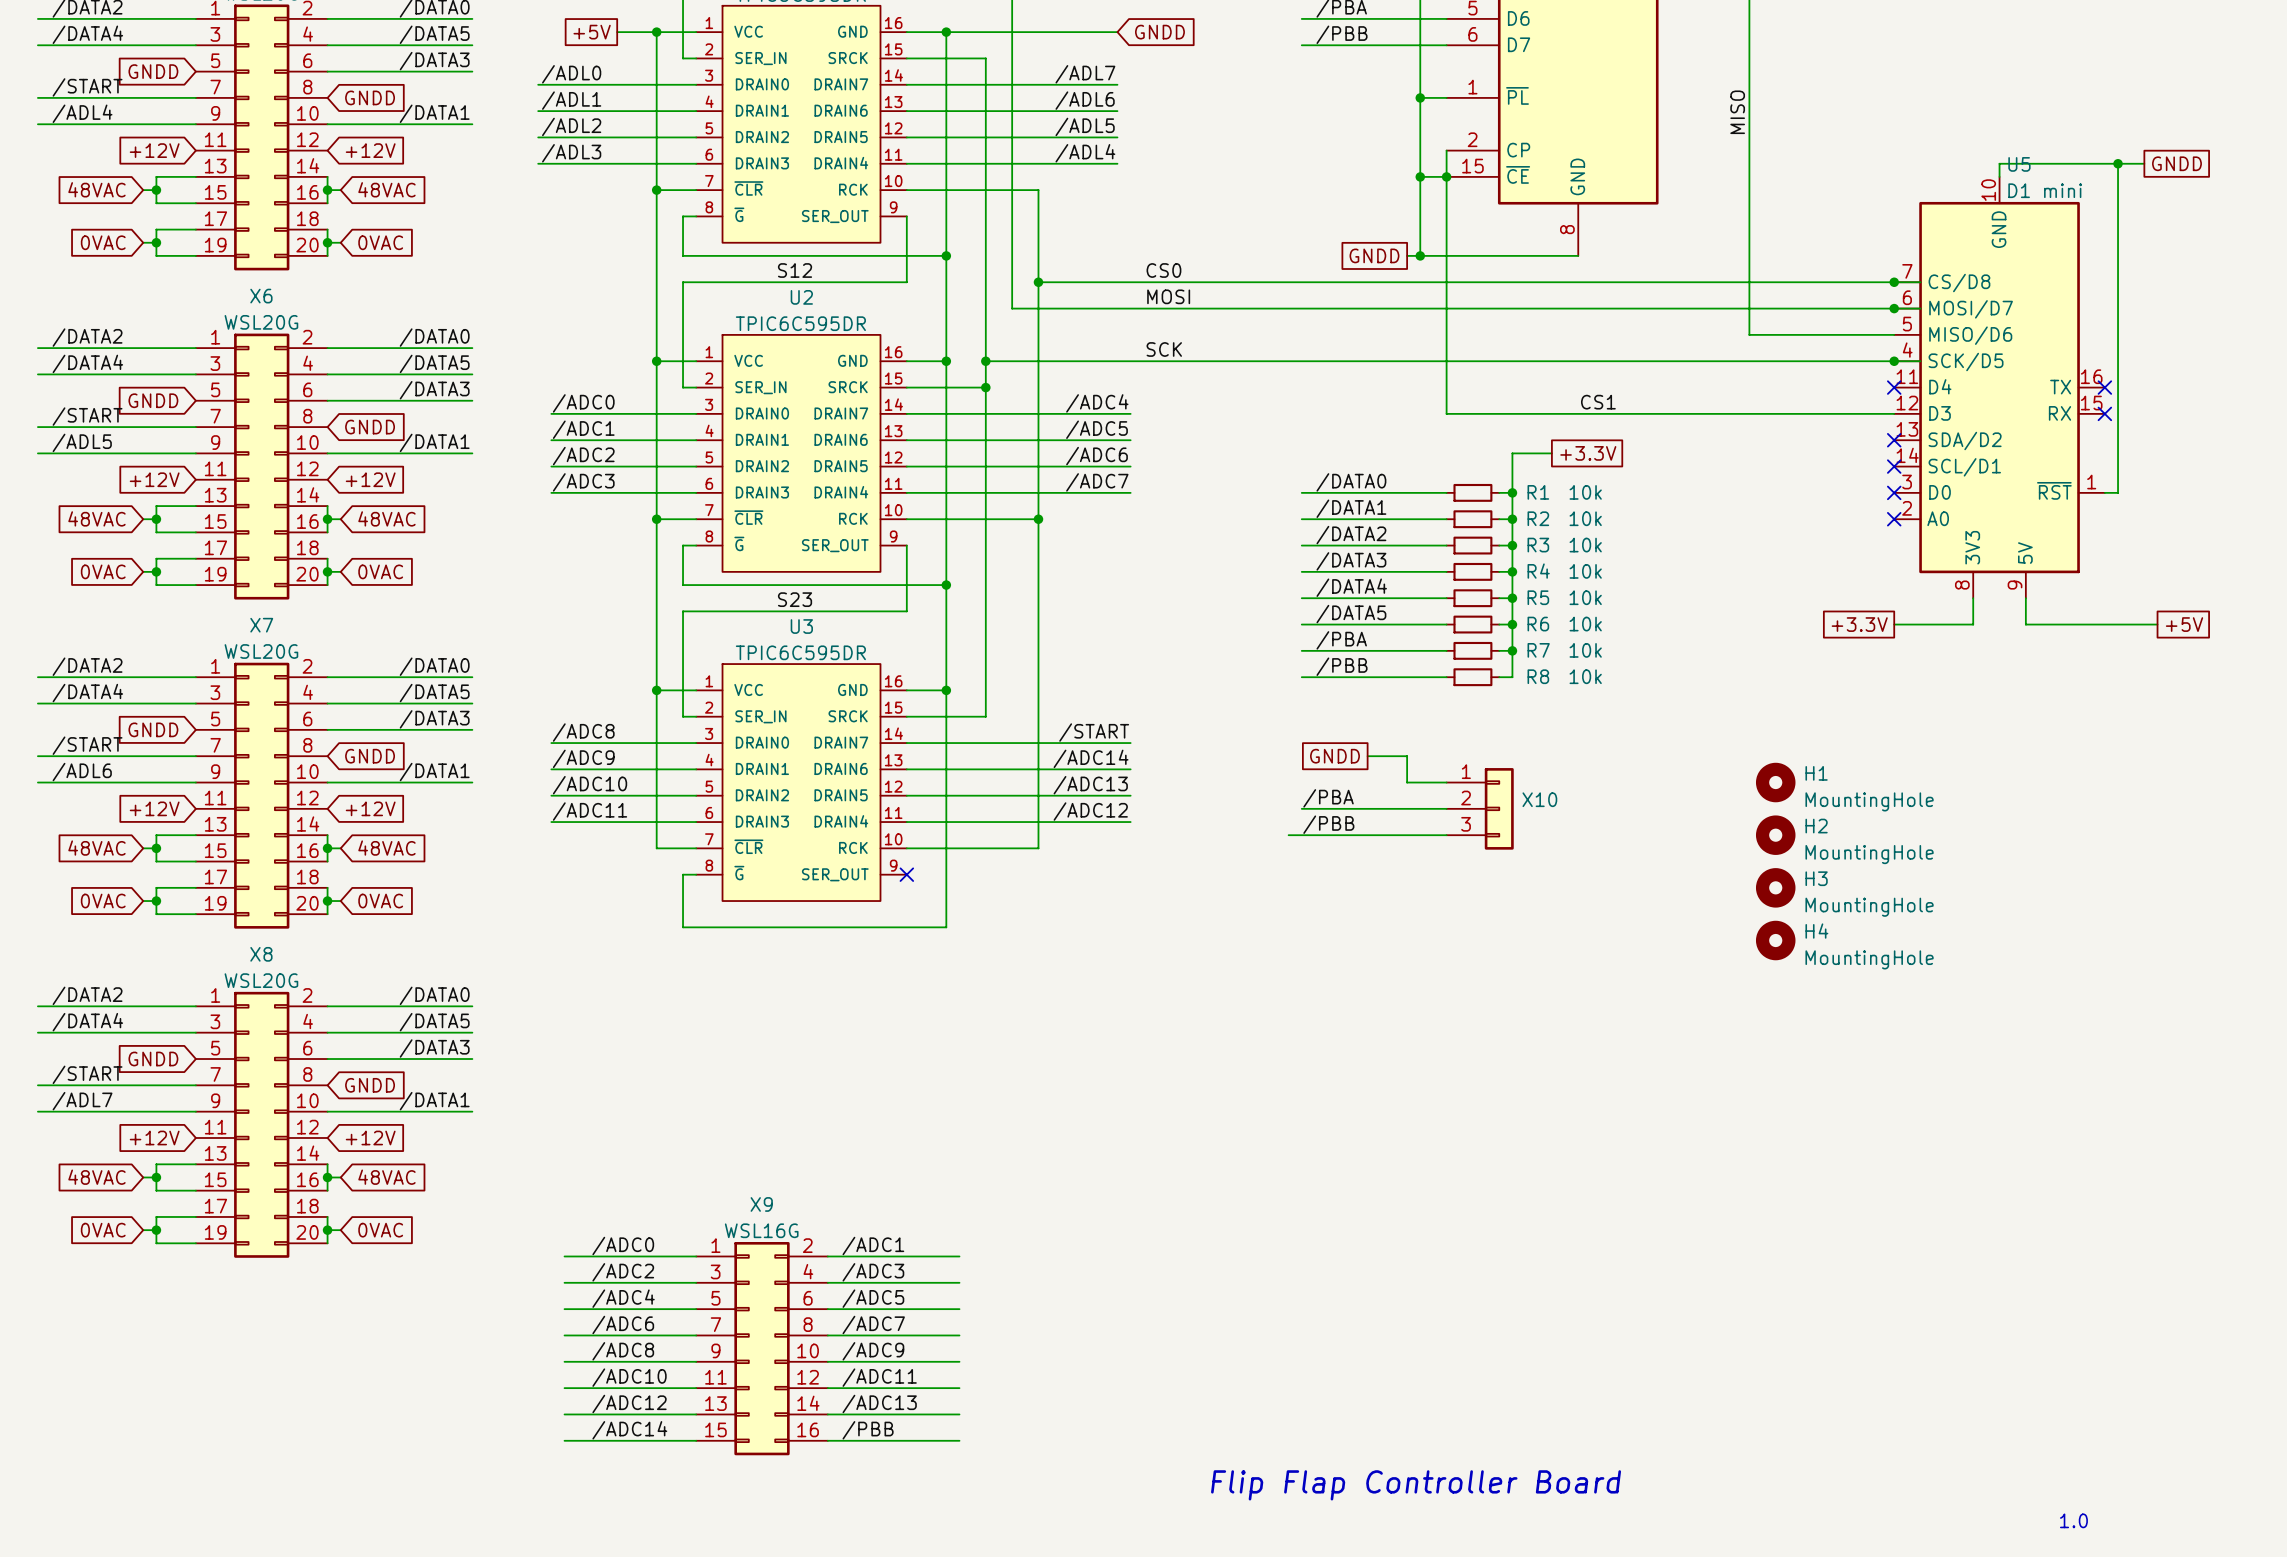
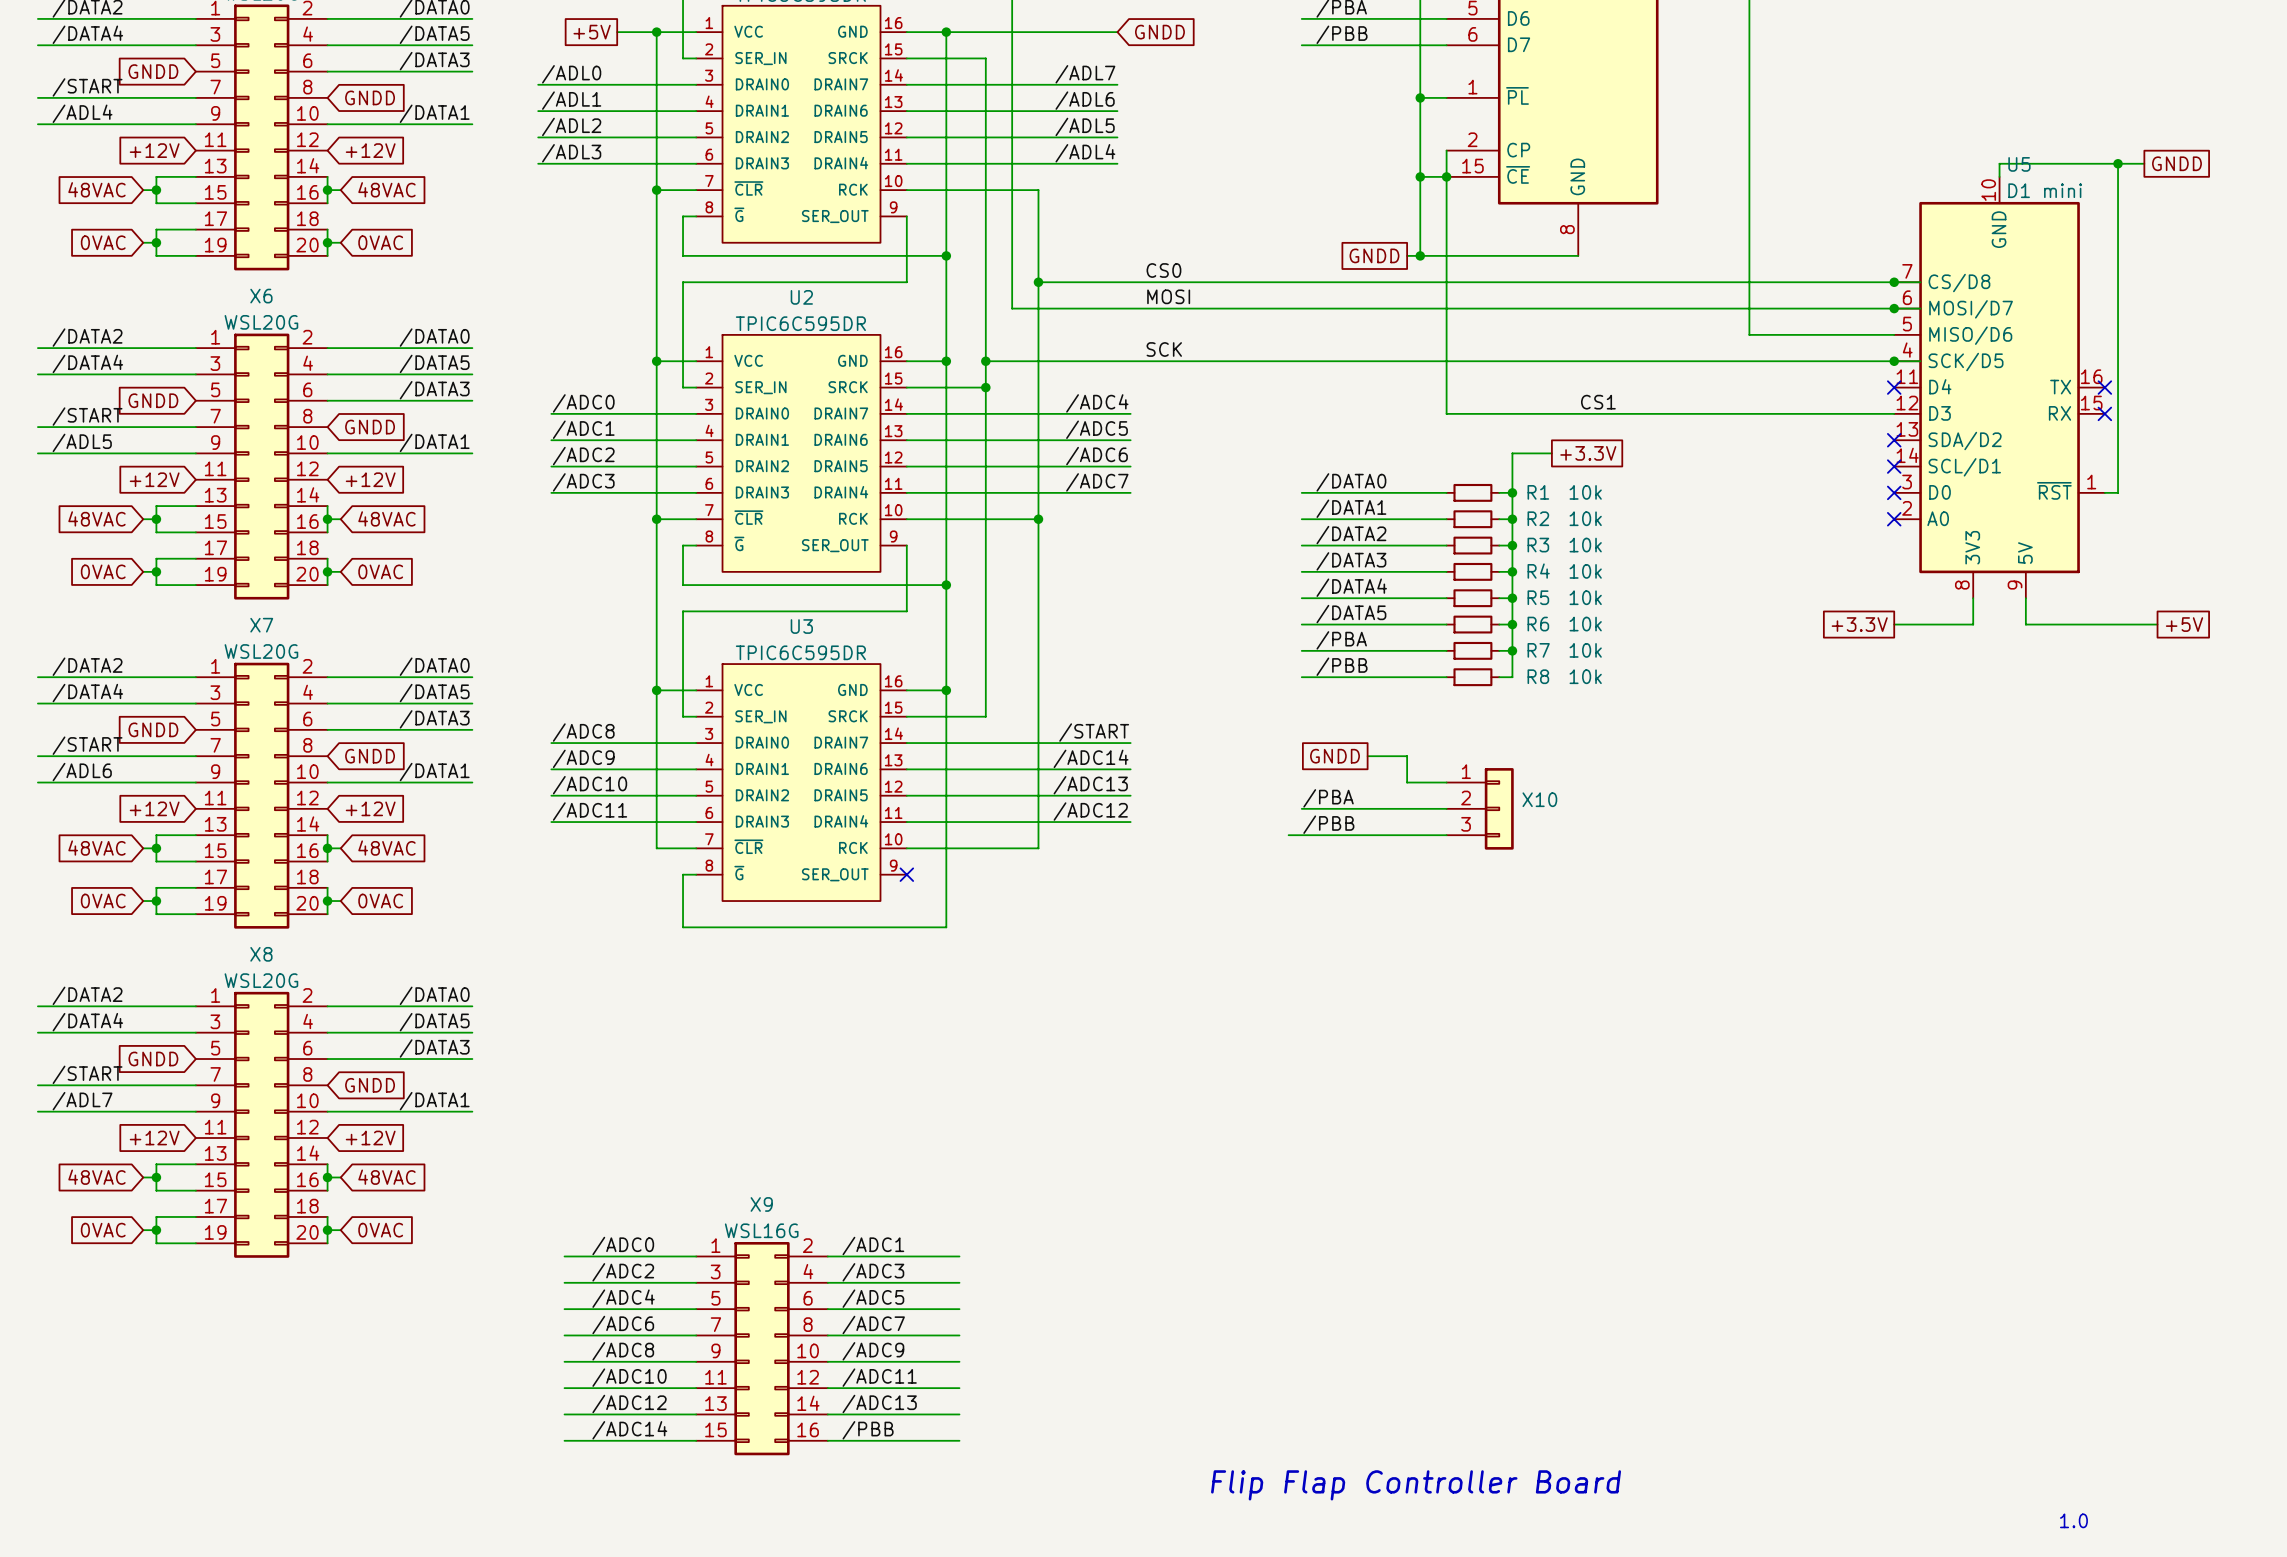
label: MISO (1737, 112) -> none
label: S12 (795, 270) -> none
label: S23 (795, 599) -> none
H1: MountingHole (1775, 782) -> none
H2: MountingHole (1775, 835) -> none
H3: MountingHole (1775, 887) -> none
H4: MountingHole (1775, 940) -> none

